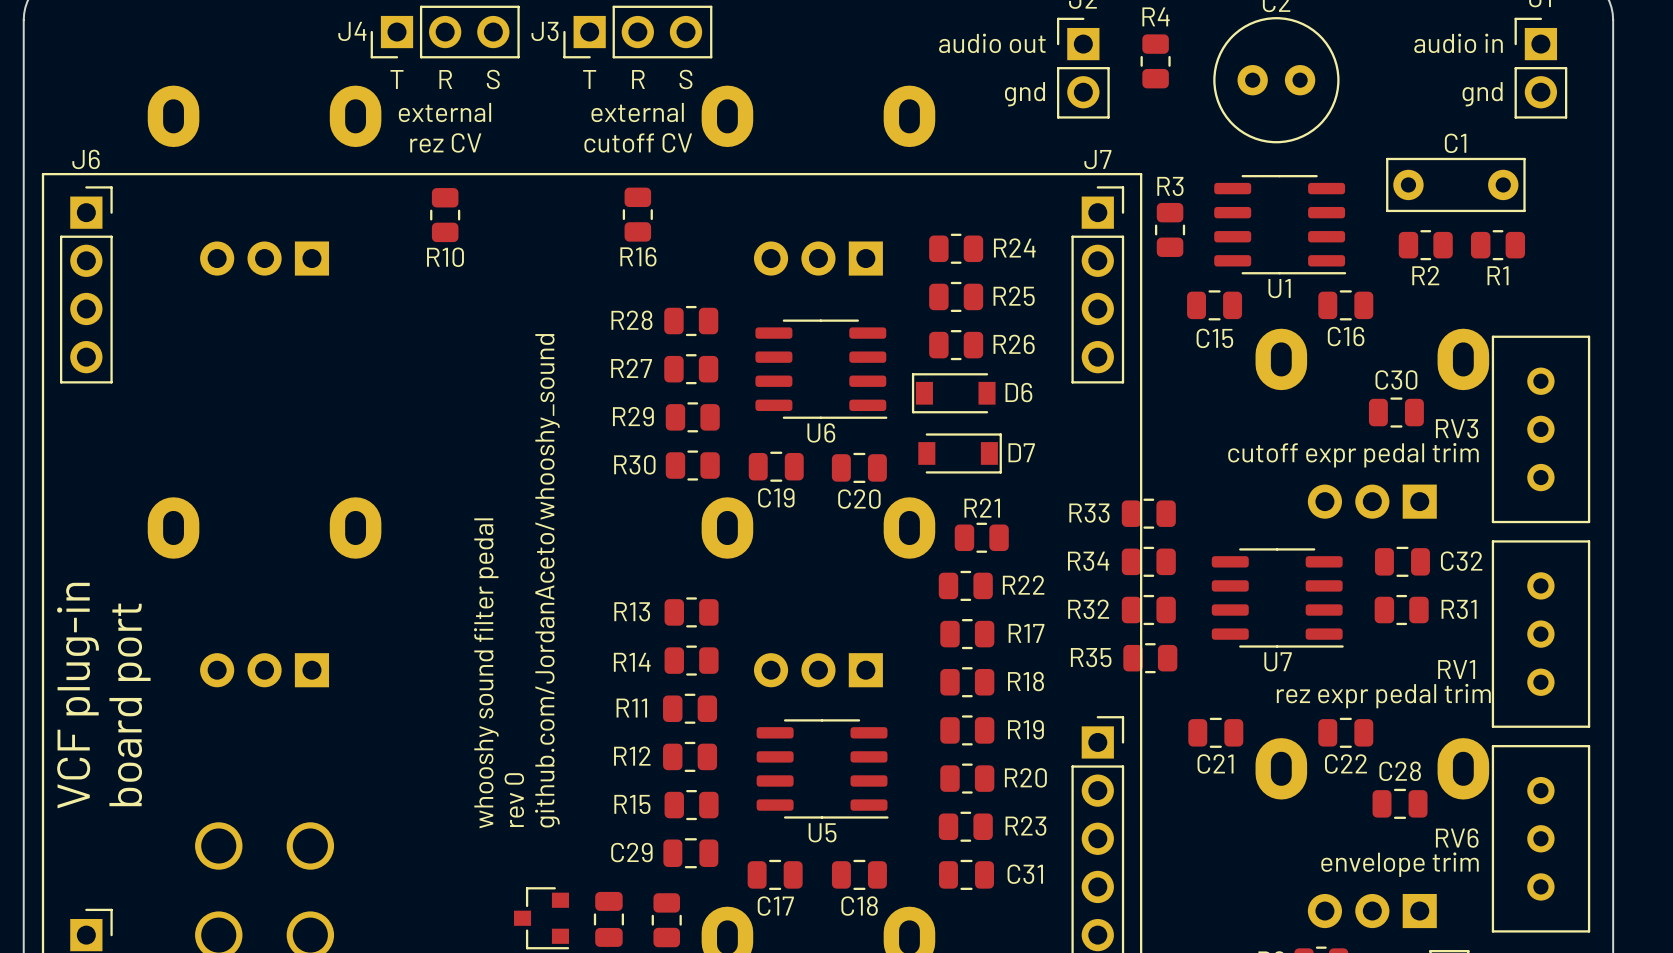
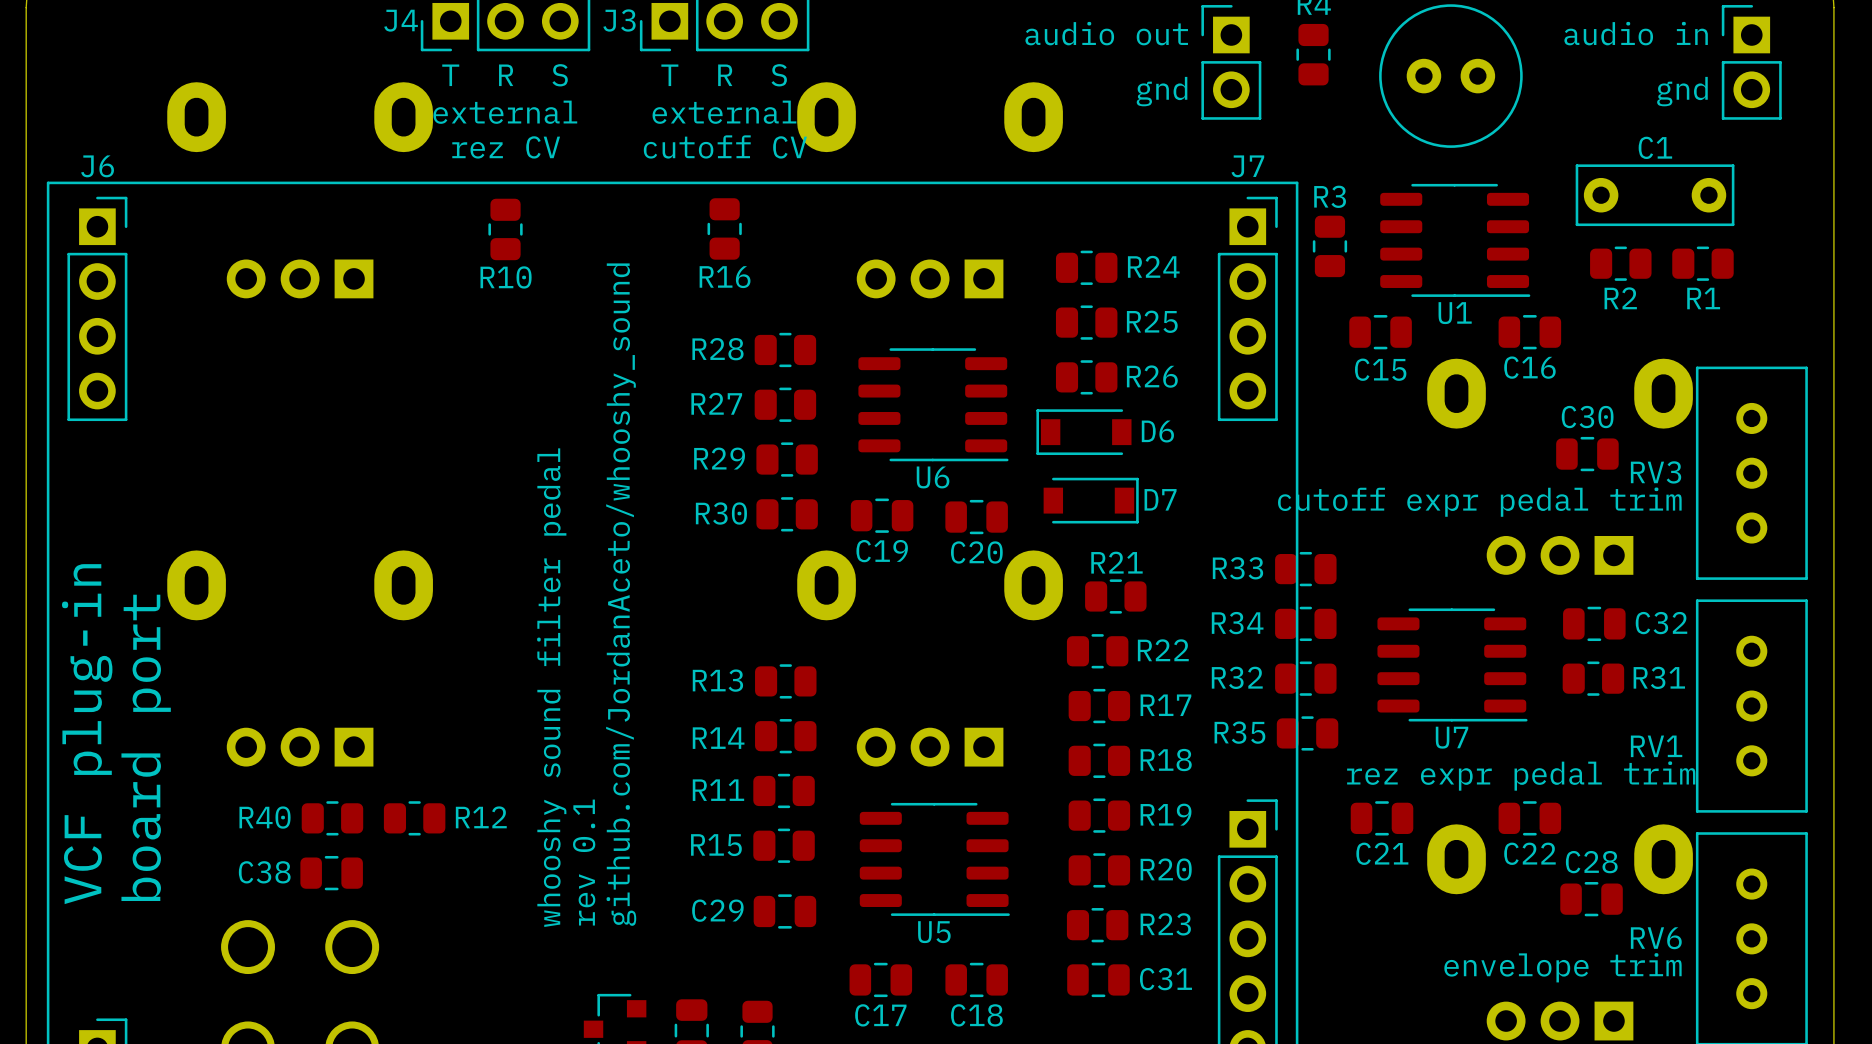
R40: none -> (332, 818)
R12: none -> (414, 818)
R12 name: R12 (632, 756) -> R15 (716, 845)
C38: none -> (331, 873)
text: rev 0 (514, 800) -> rev 0.1 (584, 862)
R15: (691, 805) -> none
C29 position: (690, 853) -> (784, 911)

